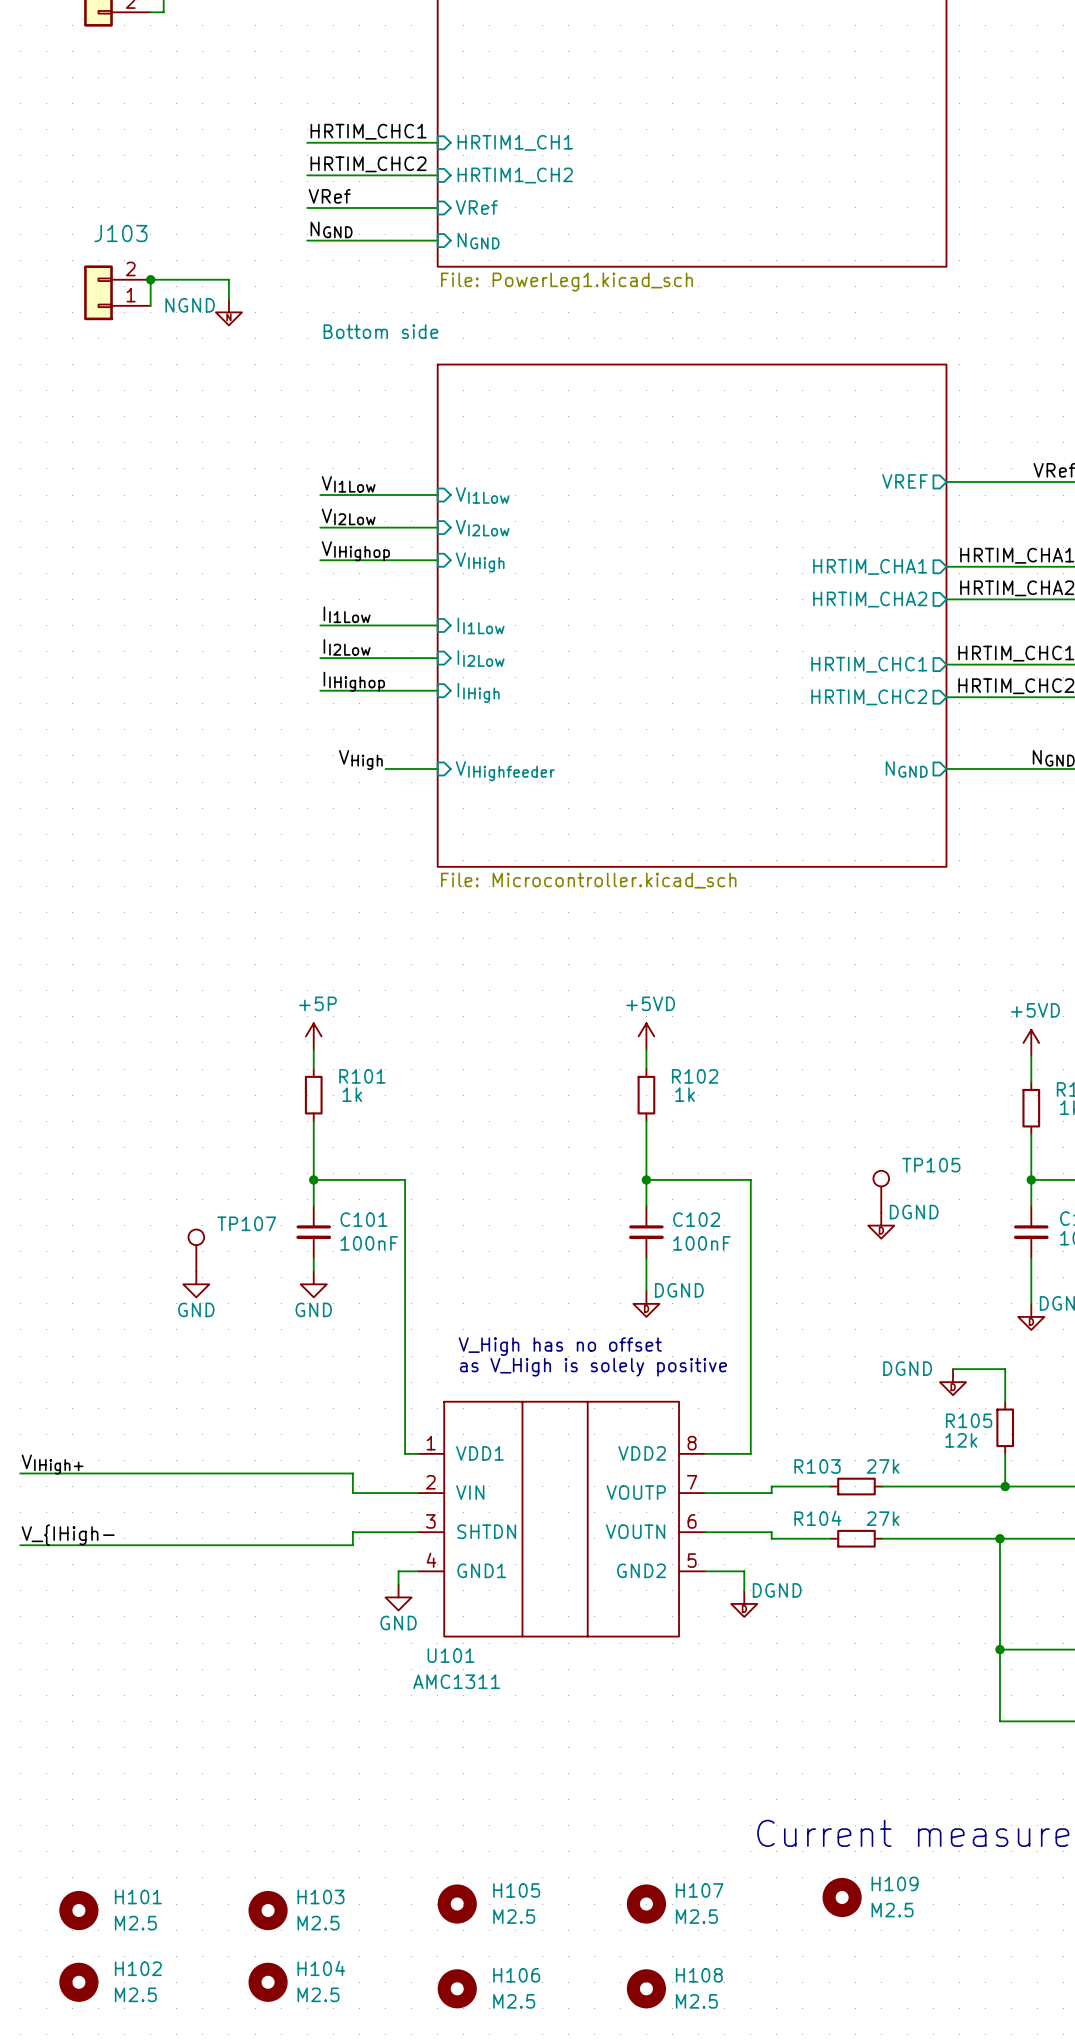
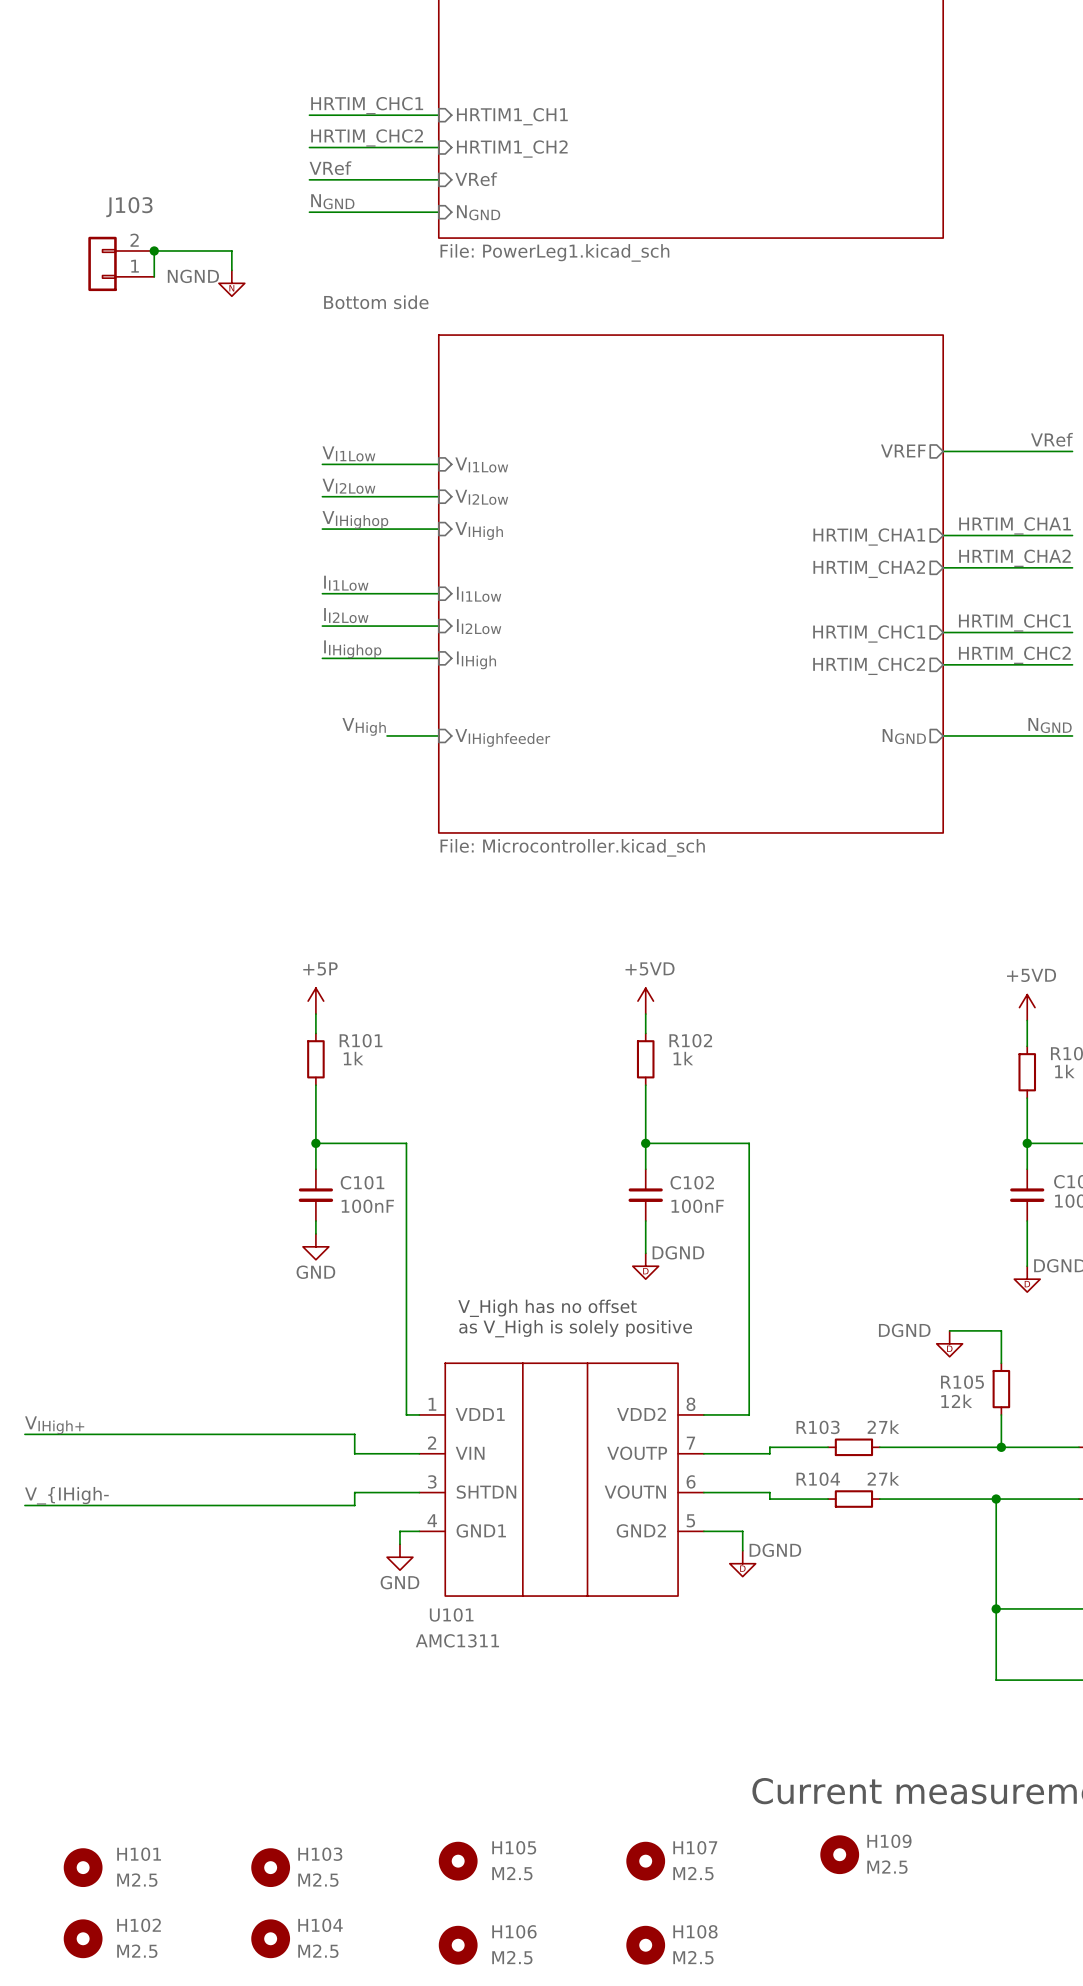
TP105: (881, 1191) -> none
power symbol: DGND (881, 1225) -> none
TP107: (196, 1250) -> none
power symbol: GND (196, 1284) -> none

